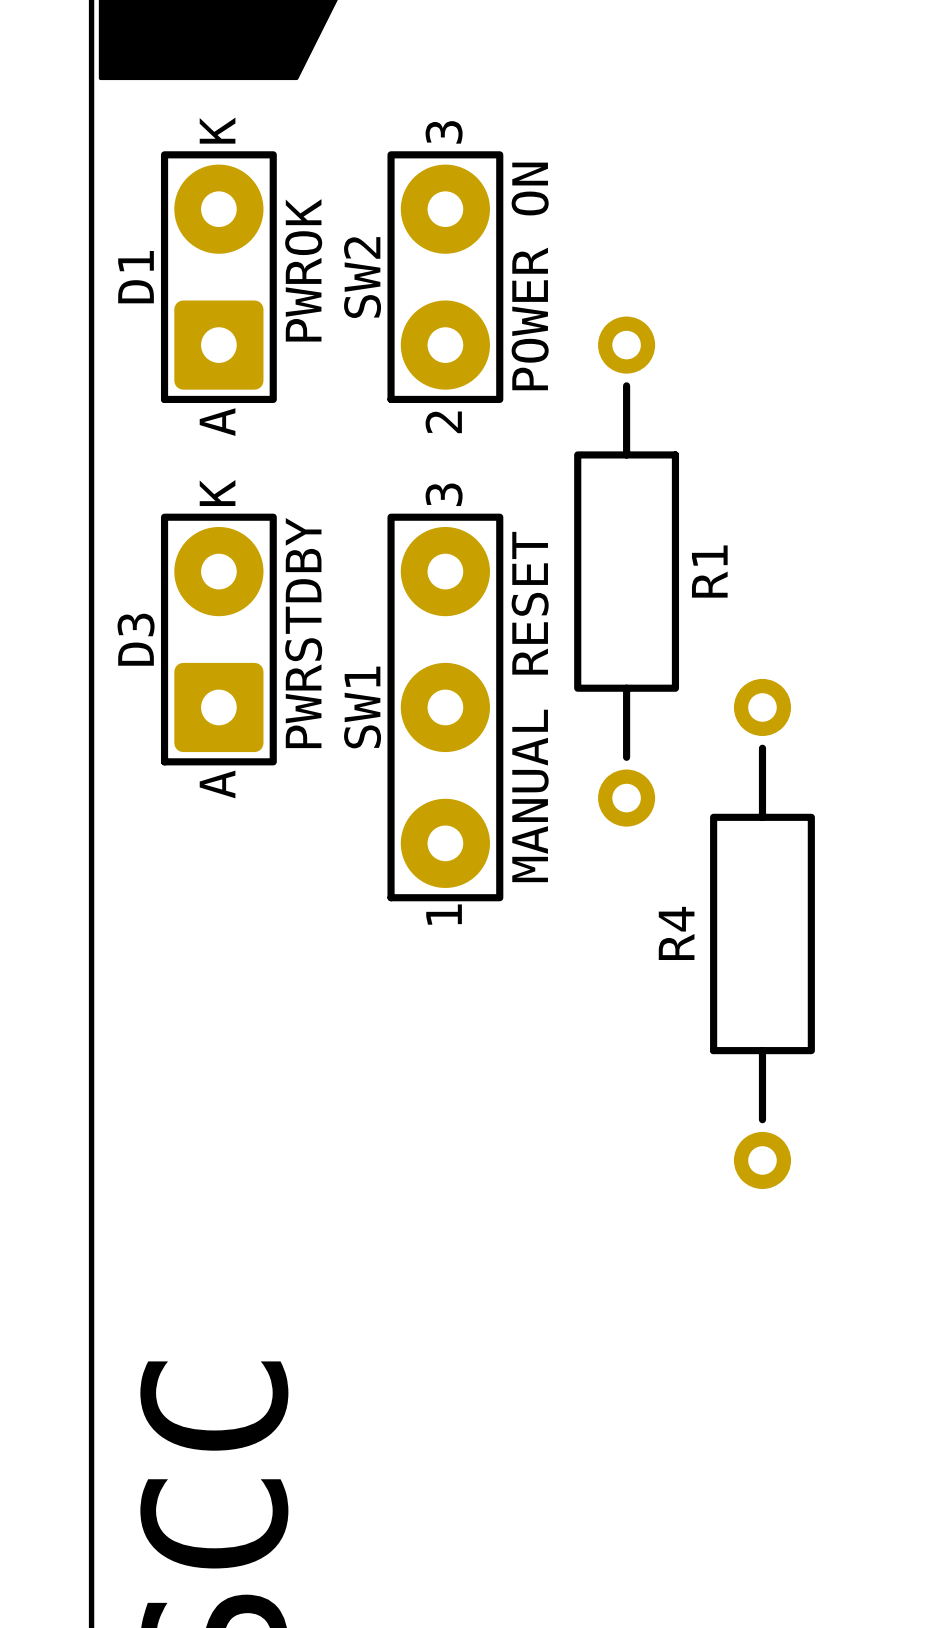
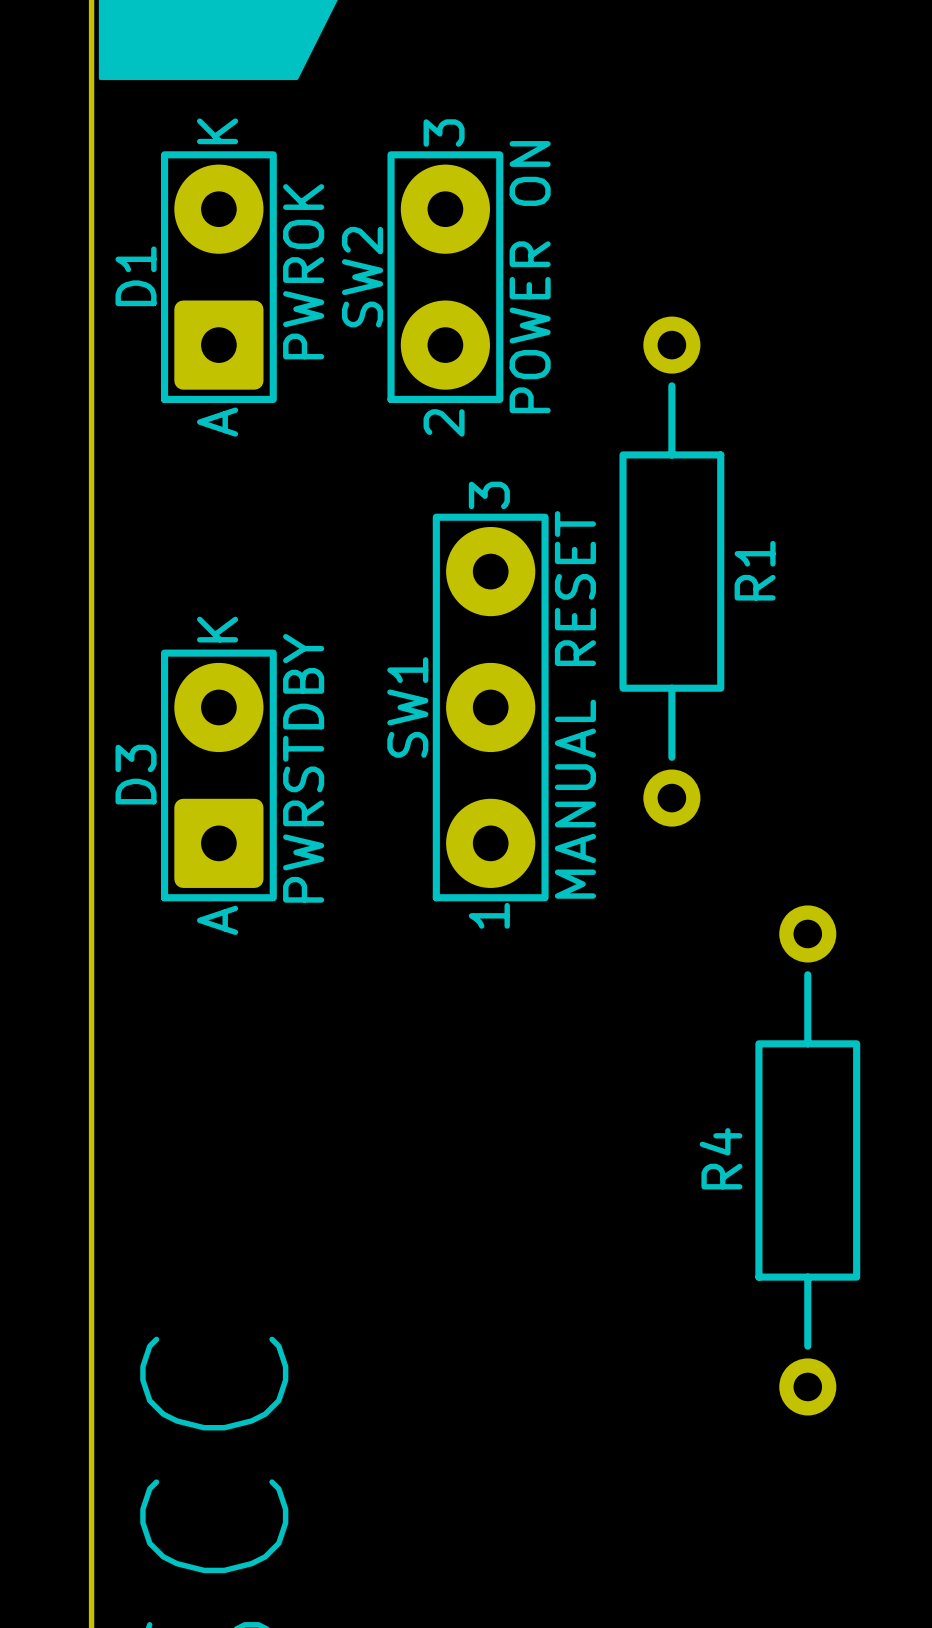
R1 position: (626, 571) -> (671, 571)
D3 position: (218, 639) -> (218, 775)
SW1 position: (445, 707) -> (490, 707)
R4 position: (762, 933) -> (807, 1160)

